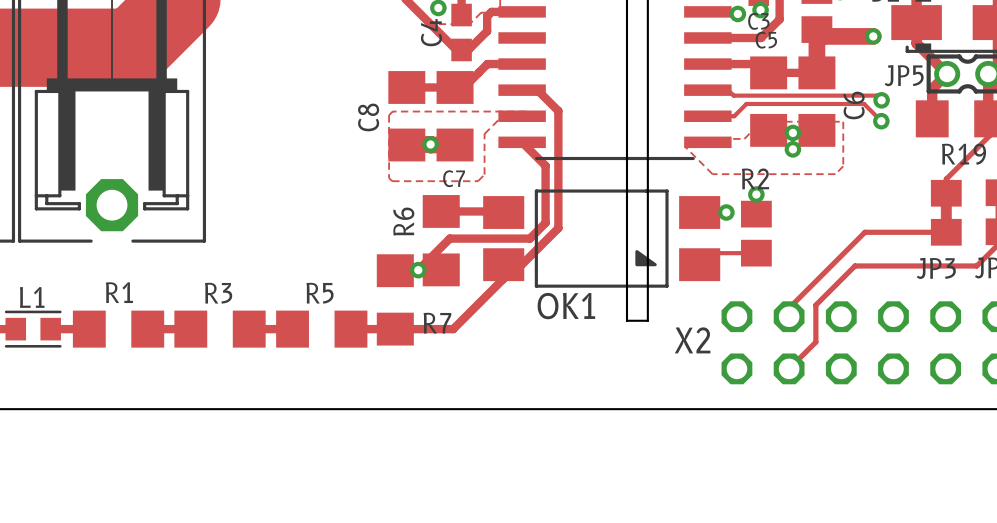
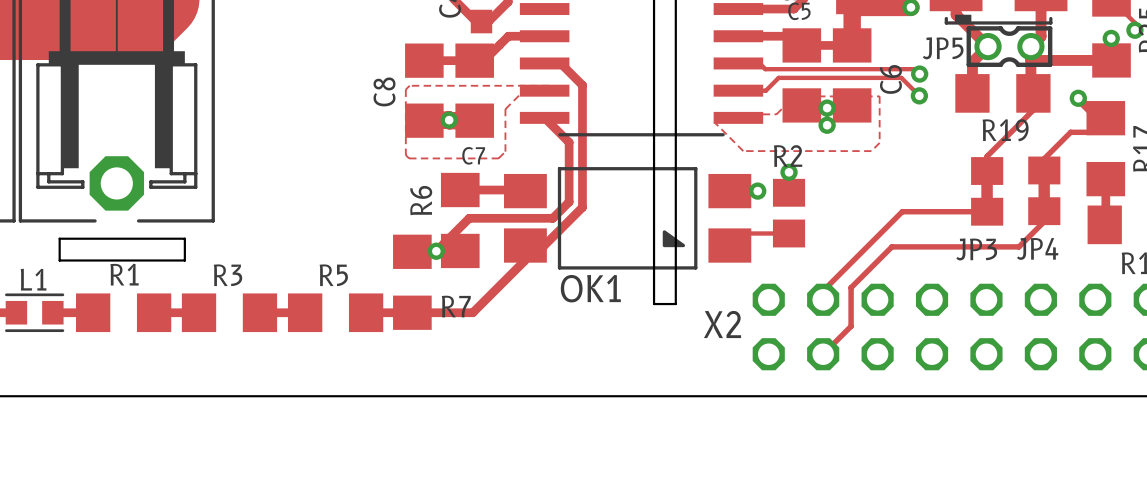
board edge: none -> (59, 238) (184, 238) (184, 260) (59, 260) (59, 238)

